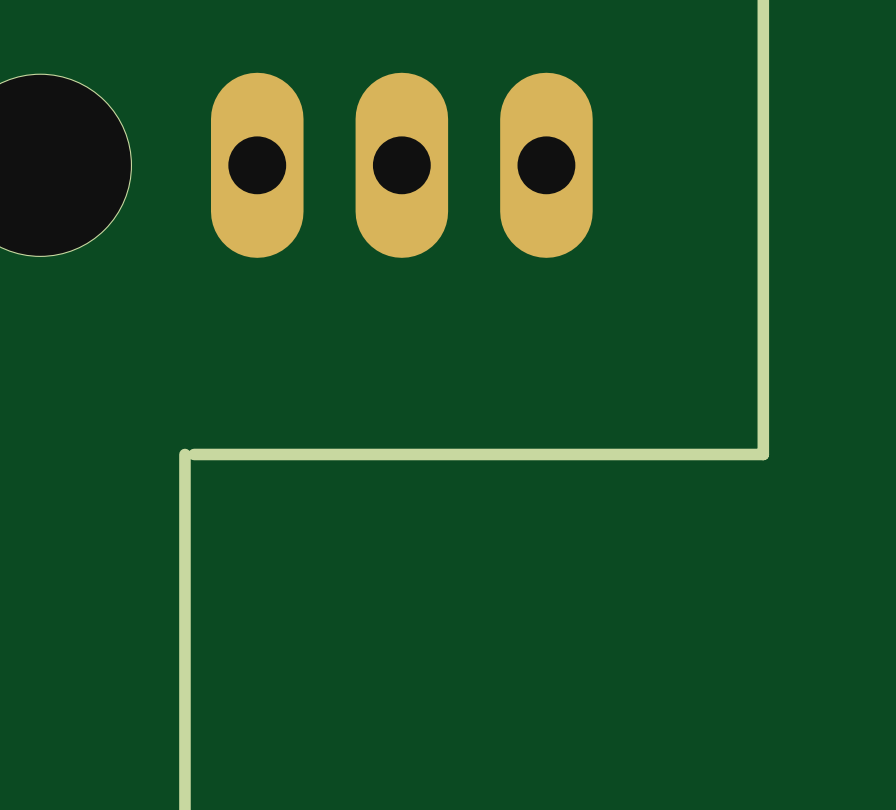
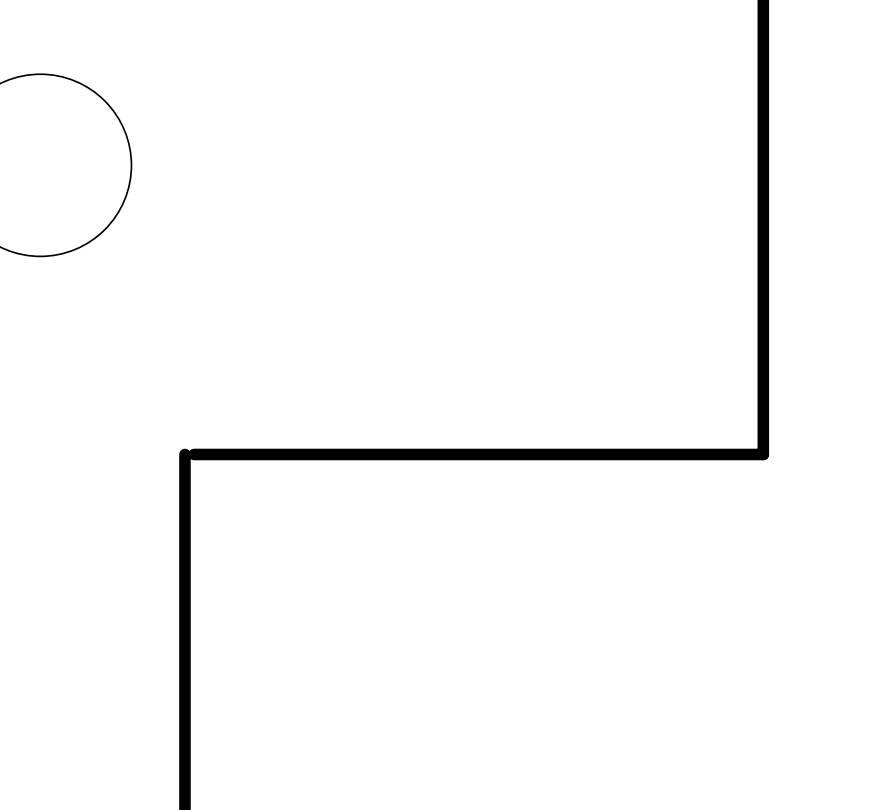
part: (401, 165) -> none

